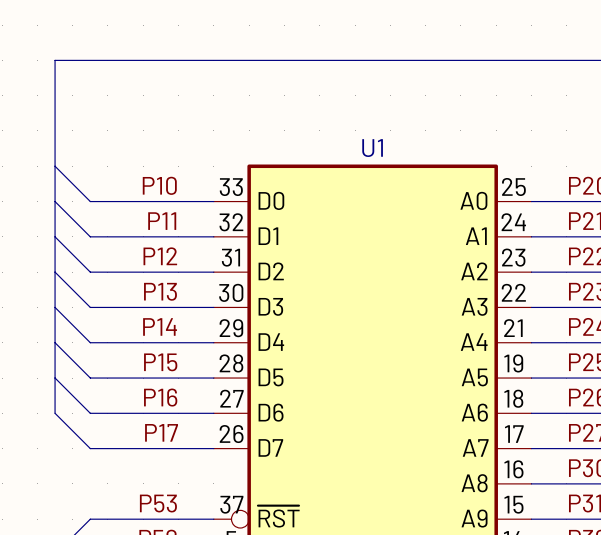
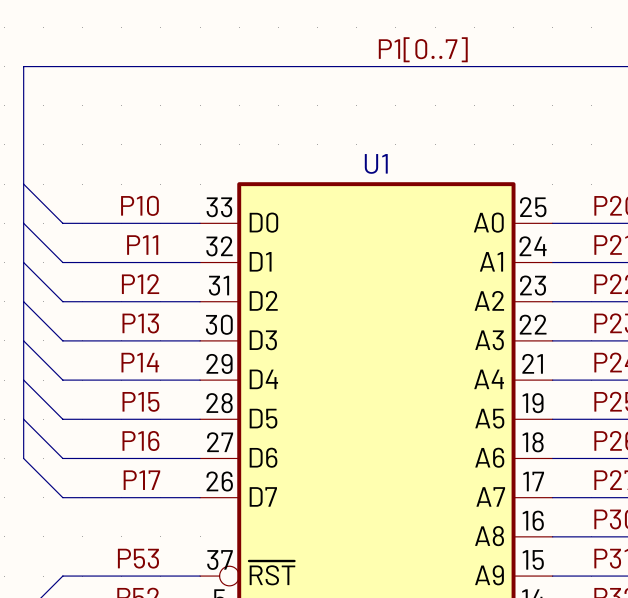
label: none -> P1[0..7] (423, 49)

